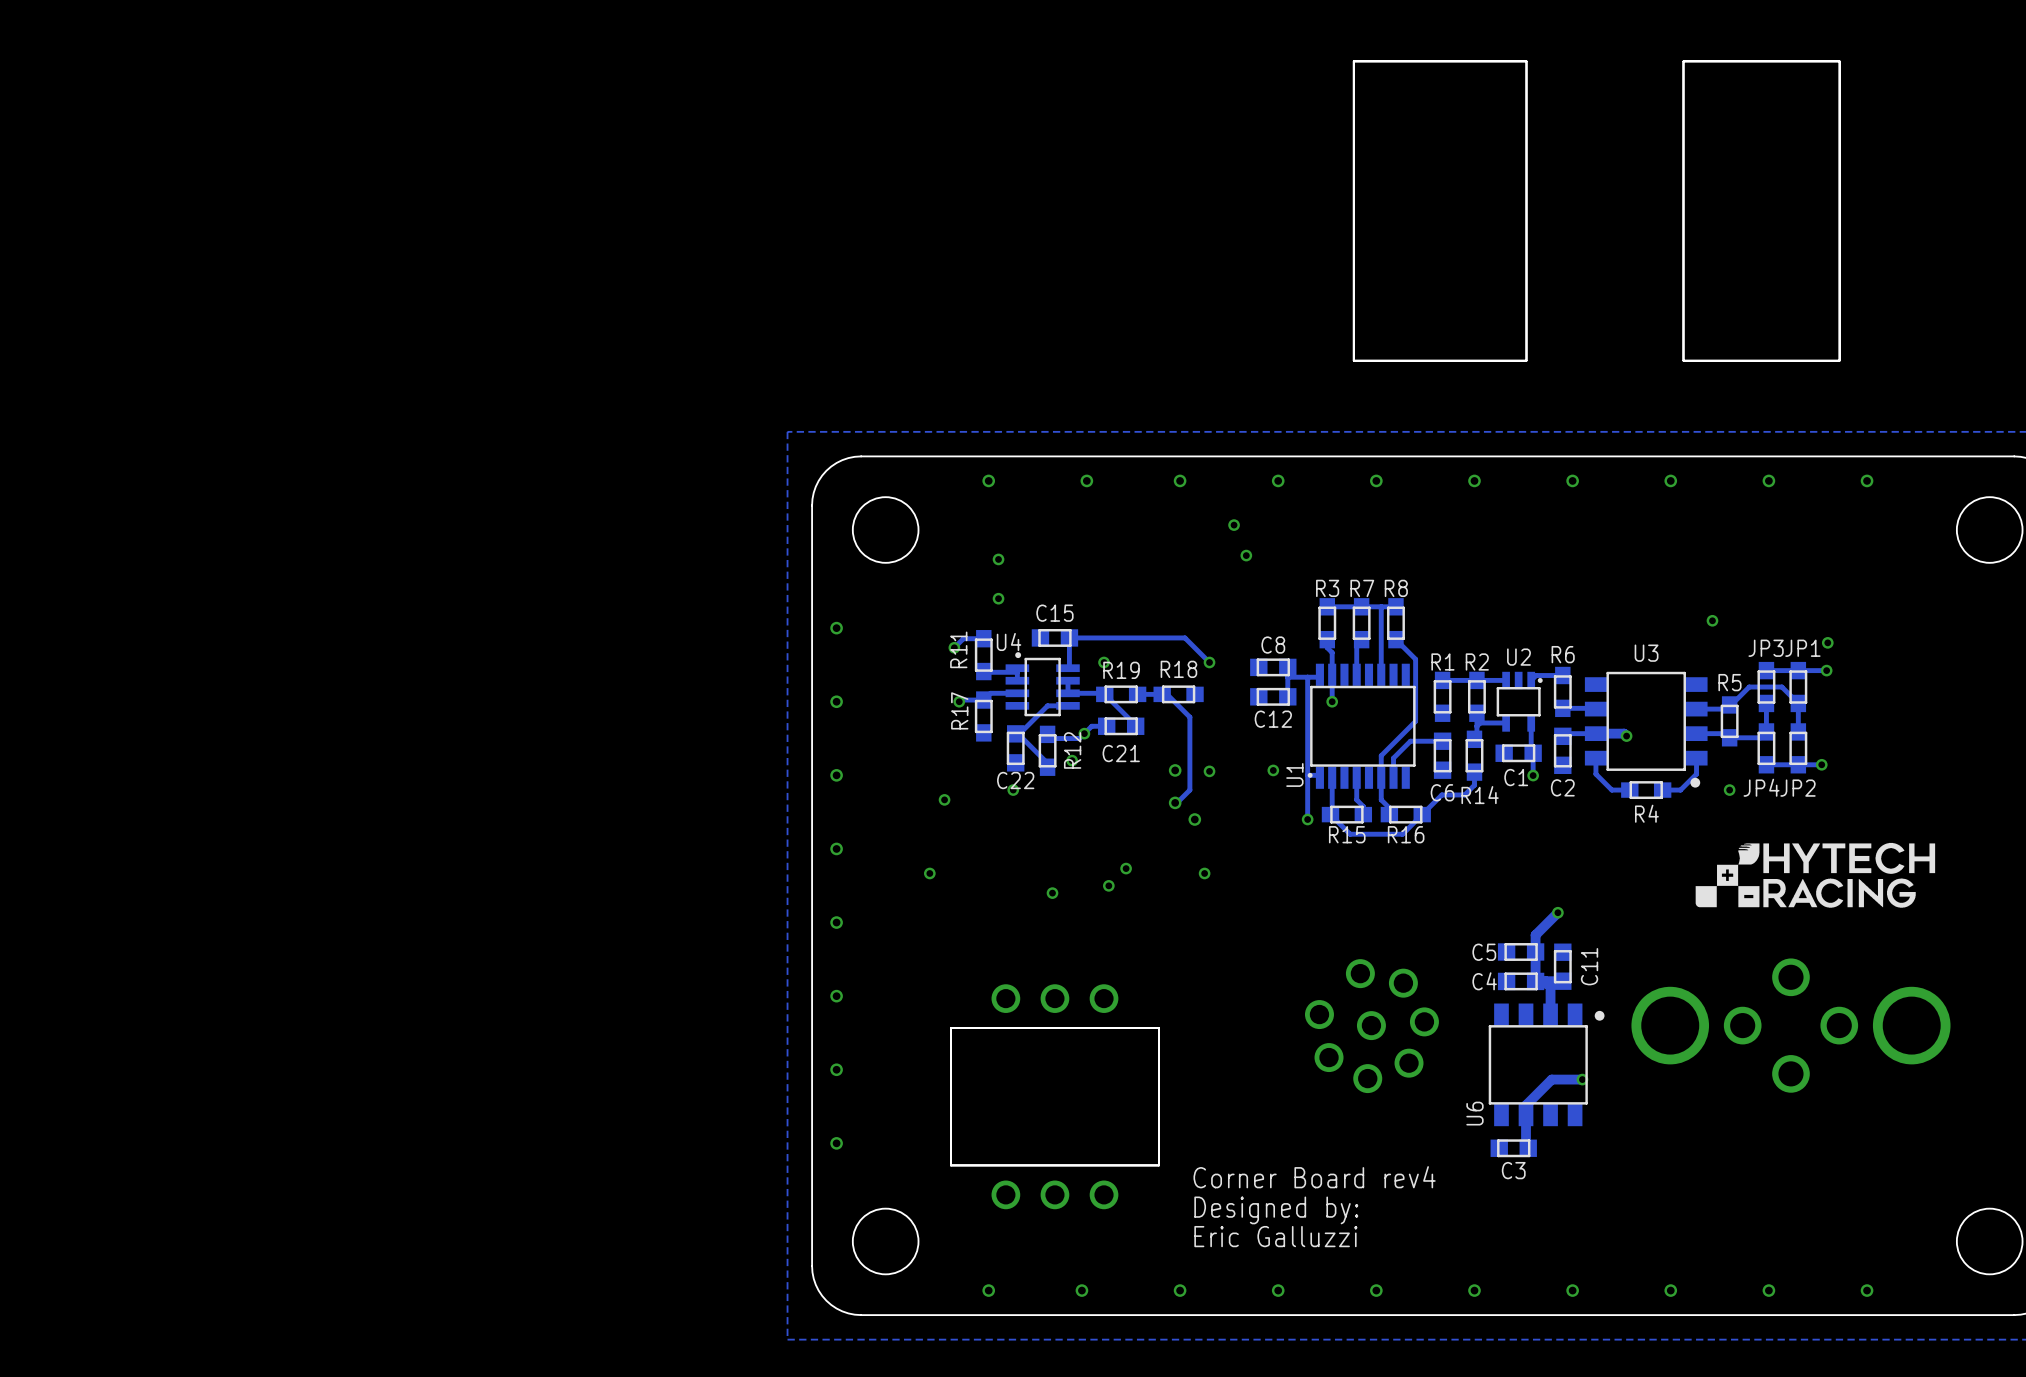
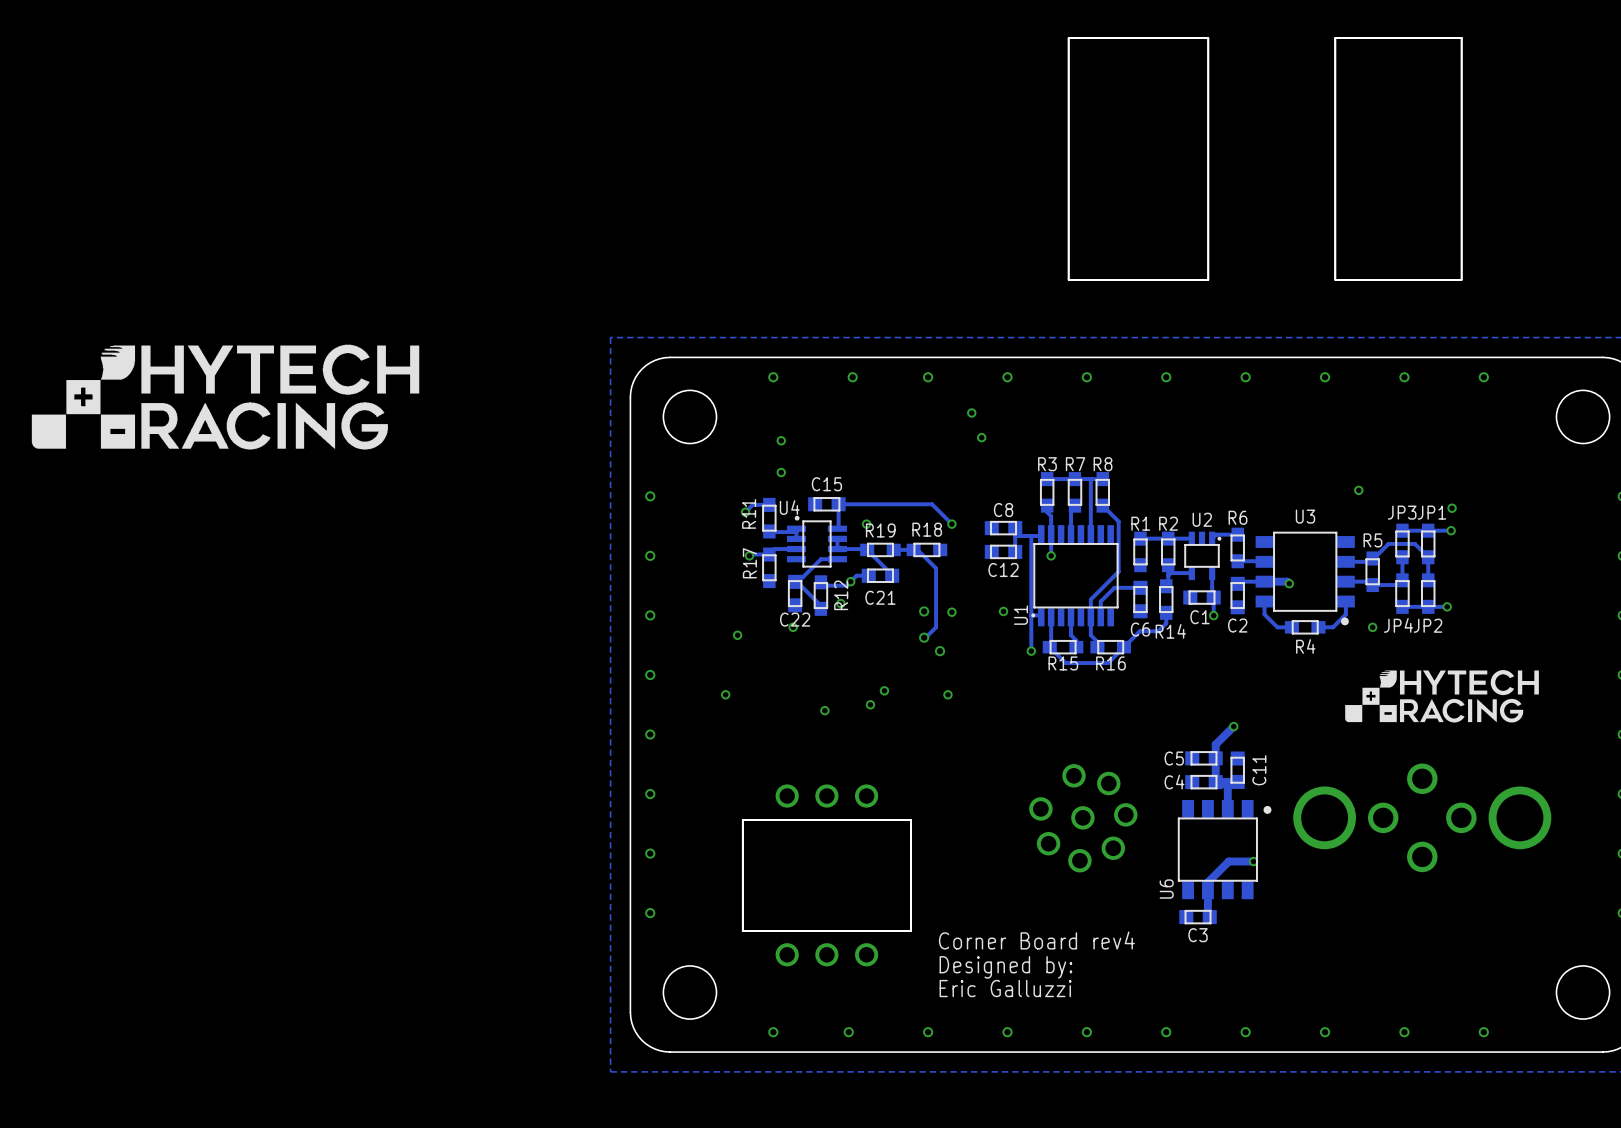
drawing: none -> [31, 344, 420, 450]

